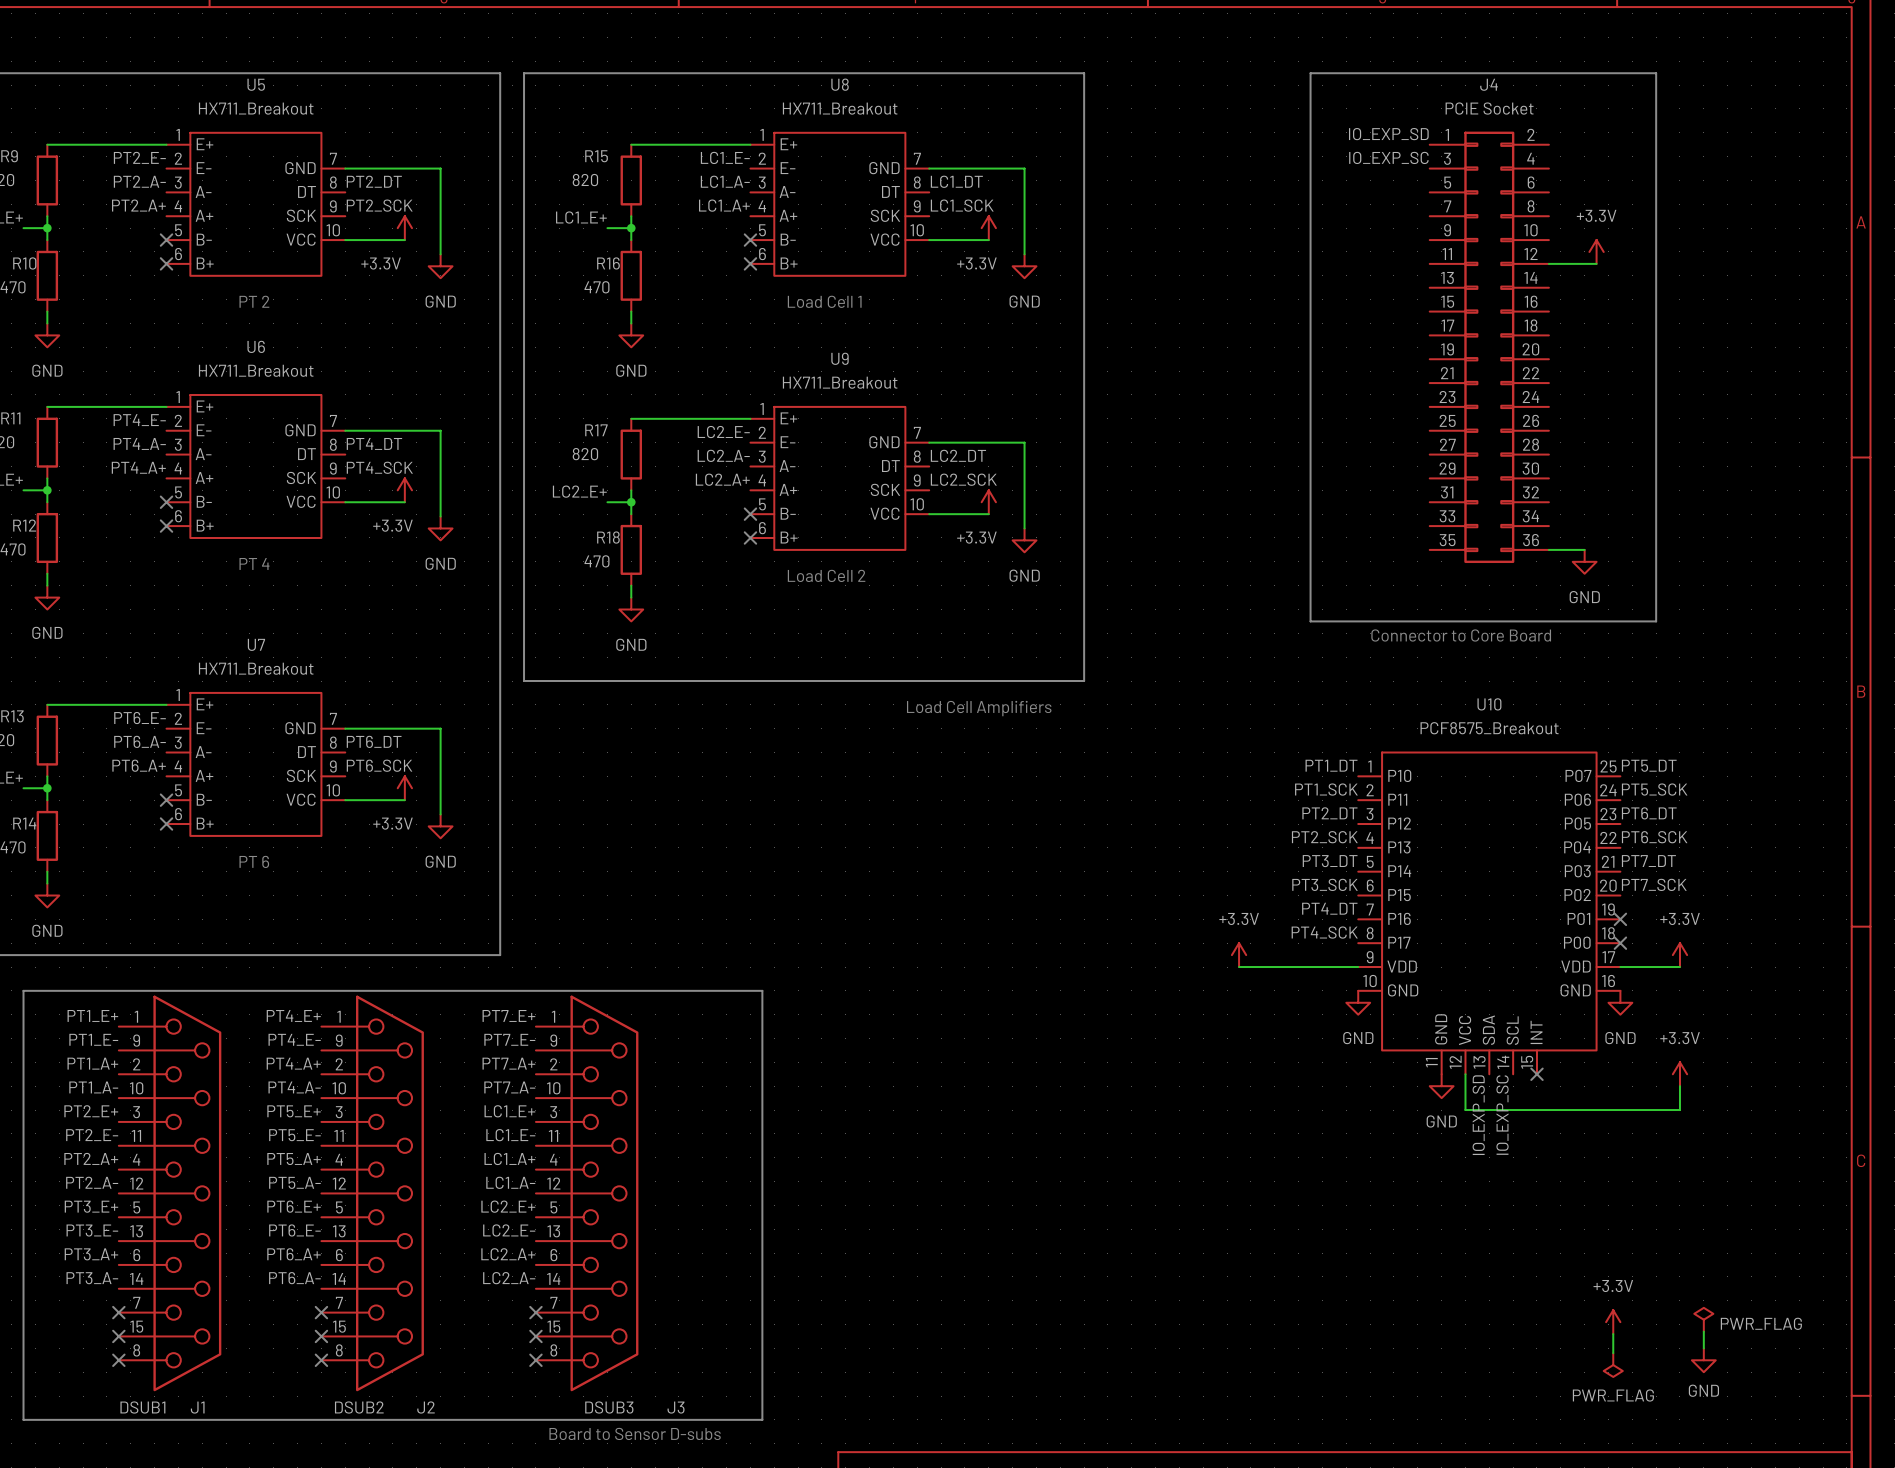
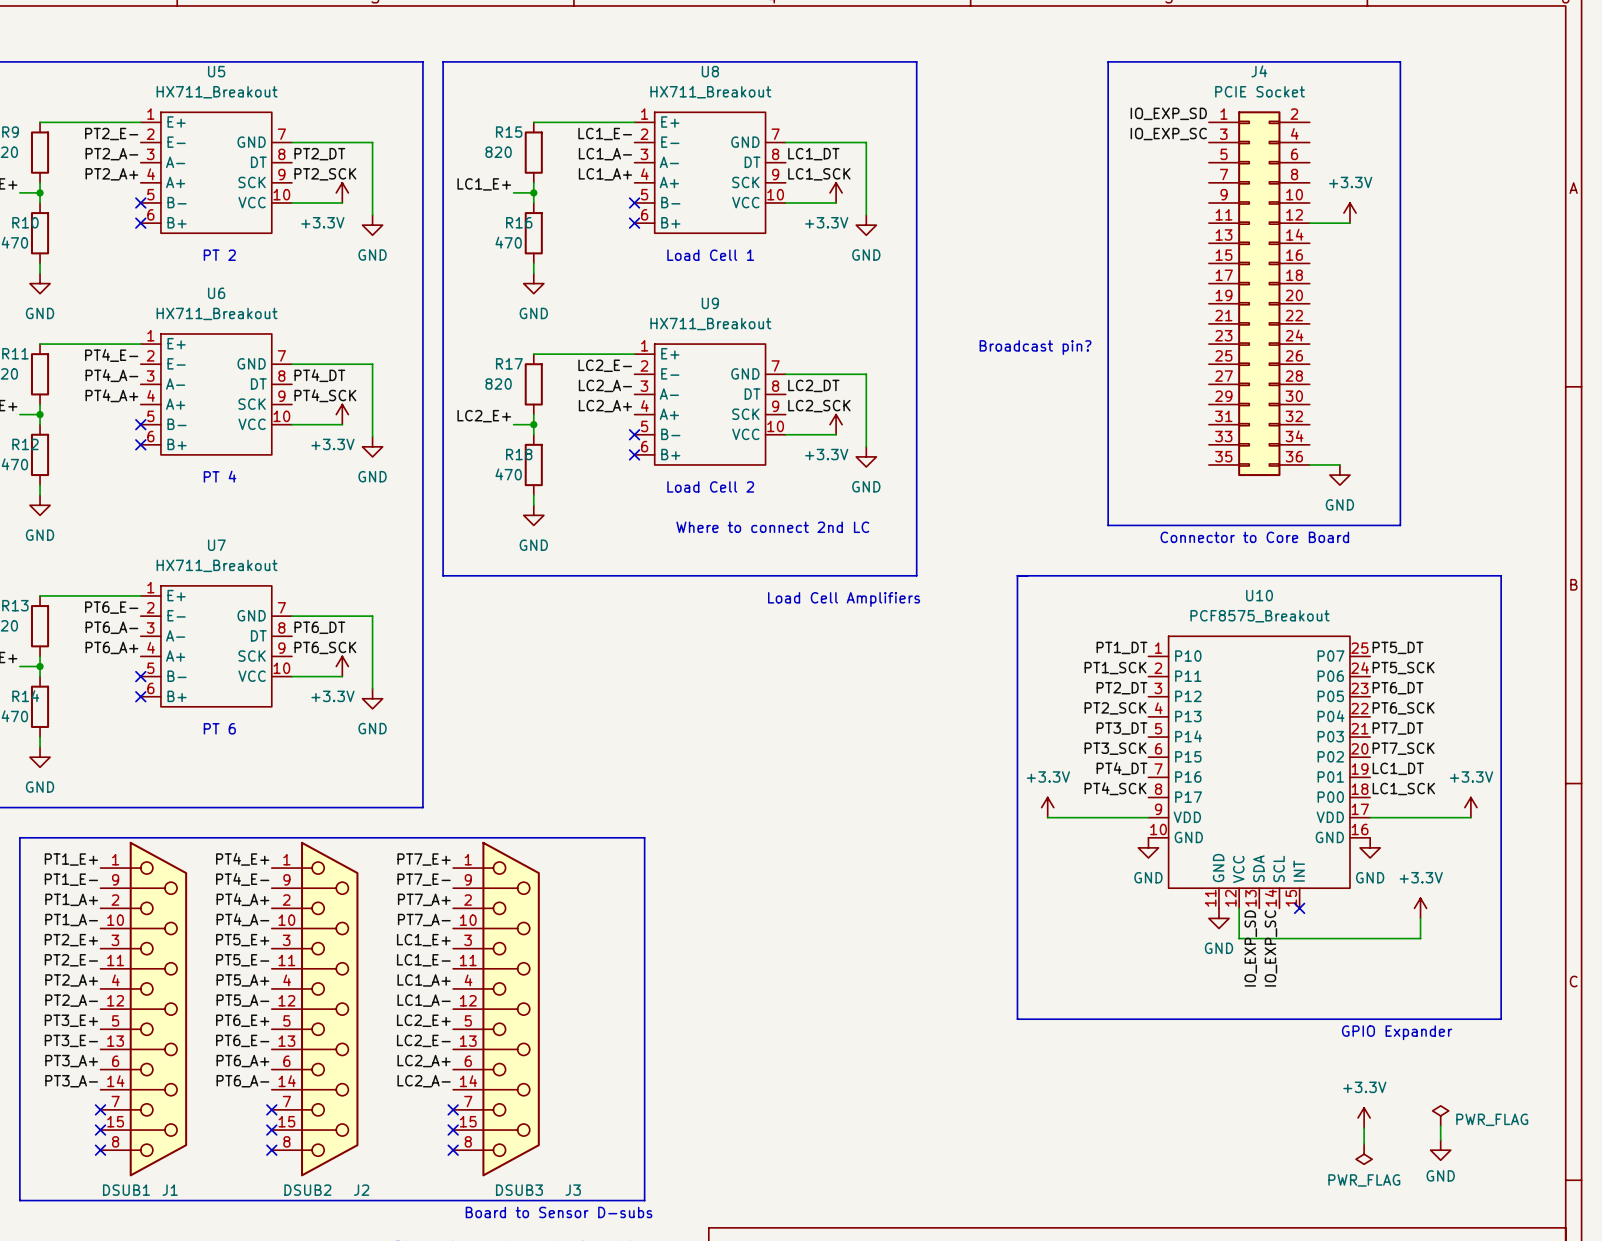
text: none -> Broadcast pin? (1035, 347)
text: none -> Where to connect 2nd LC (772, 527)
line: none -> (1017, 575) (1501, 575) (1501, 1019) (1017, 1019) (1017, 575)
label: none -> LC1_DT (1398, 768)
no-connect mark: (1620, 919) -> none
label: none -> LC1_SCK (1403, 788)
no-connect mark: (1620, 943) -> none
power symbol position: +3.3V (1679, 955) -> +3.3V (1470, 807)
wire: none -> (1420, 817) (1470, 817)
text: none -> GPIO Expander (1397, 1032)

